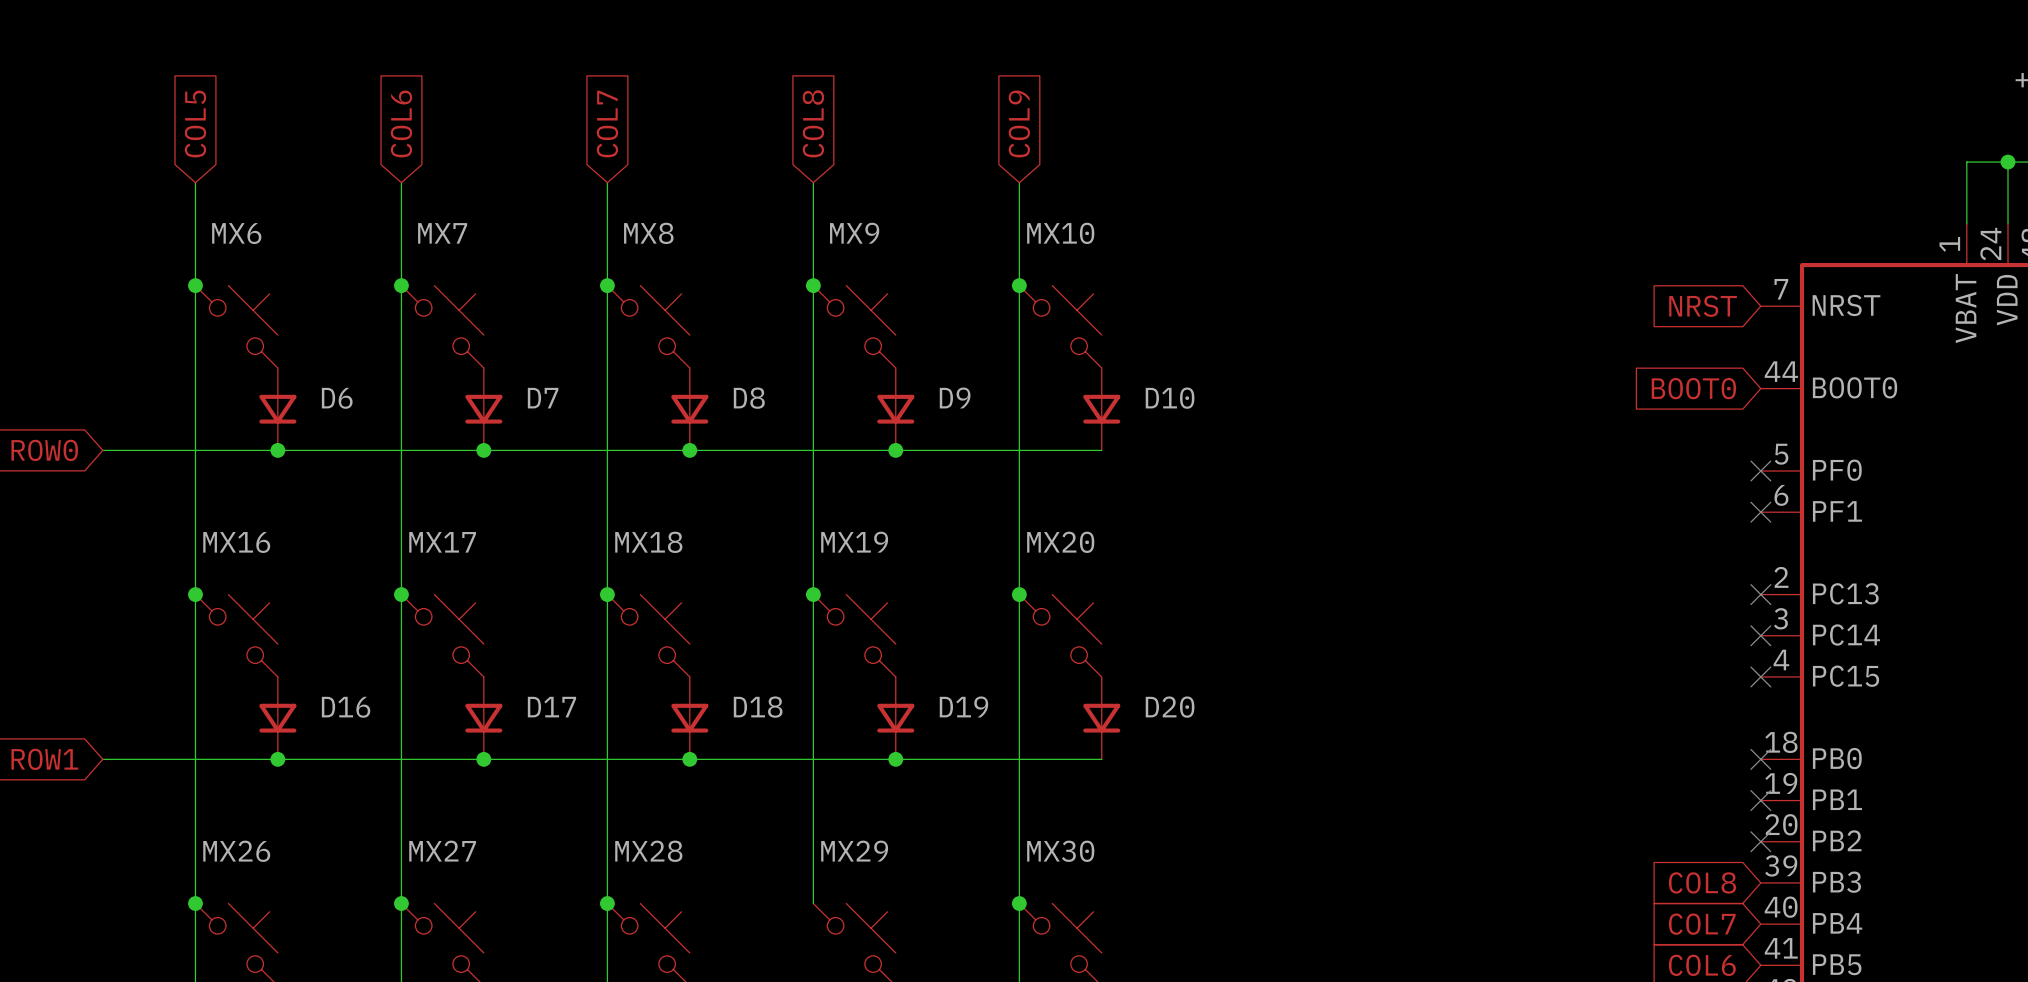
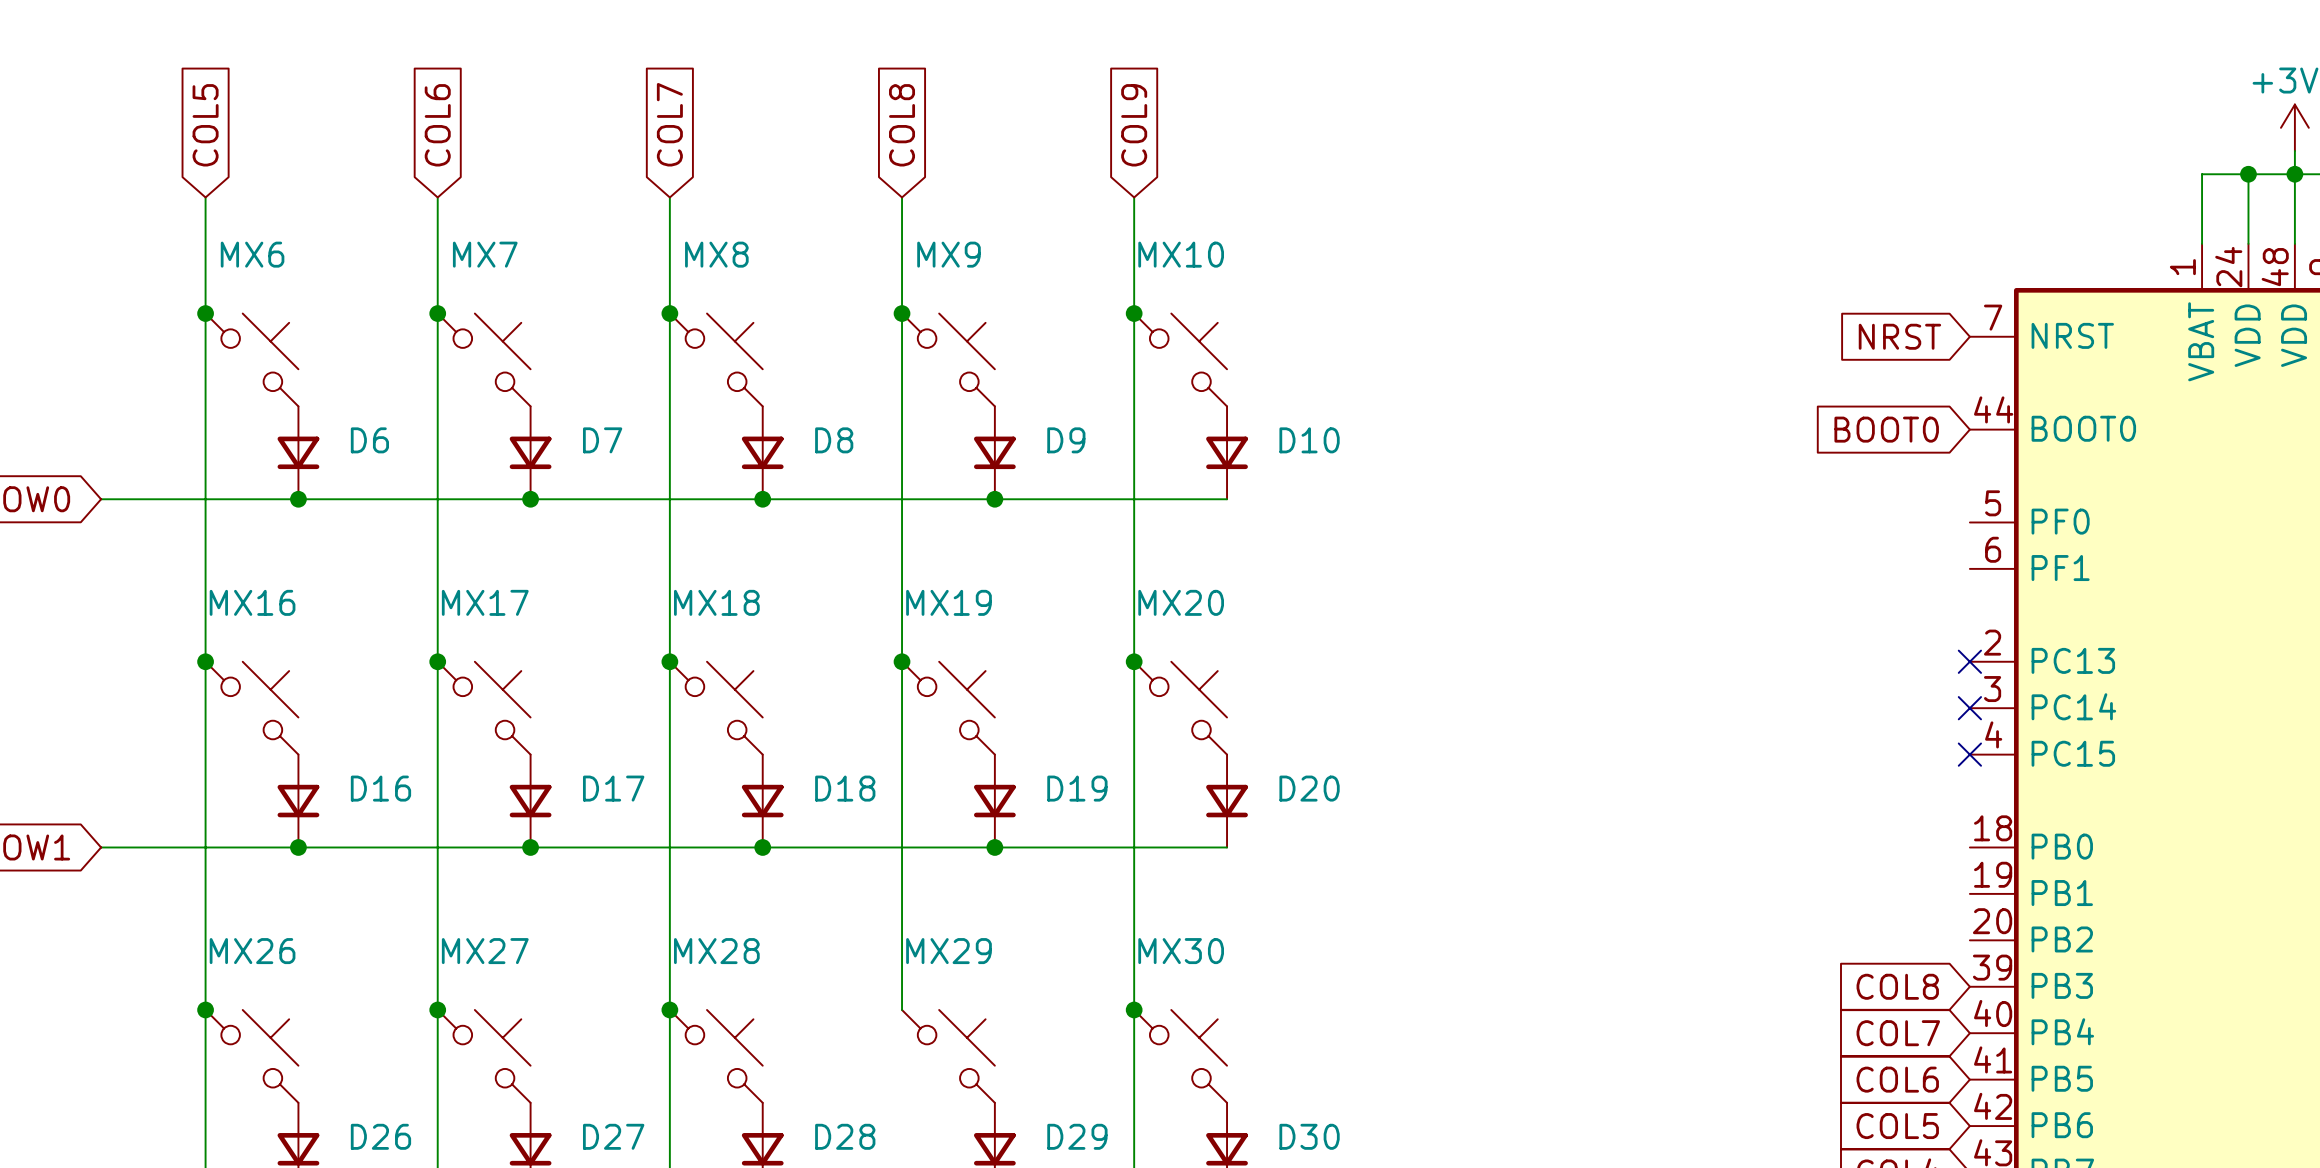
no-connect mark: (1760, 471) -> none
no-connect mark: (1760, 512) -> none
no-connect mark: (1760, 759) -> none
no-connect mark: (1760, 800) -> none
no-connect mark: (1760, 841) -> none

